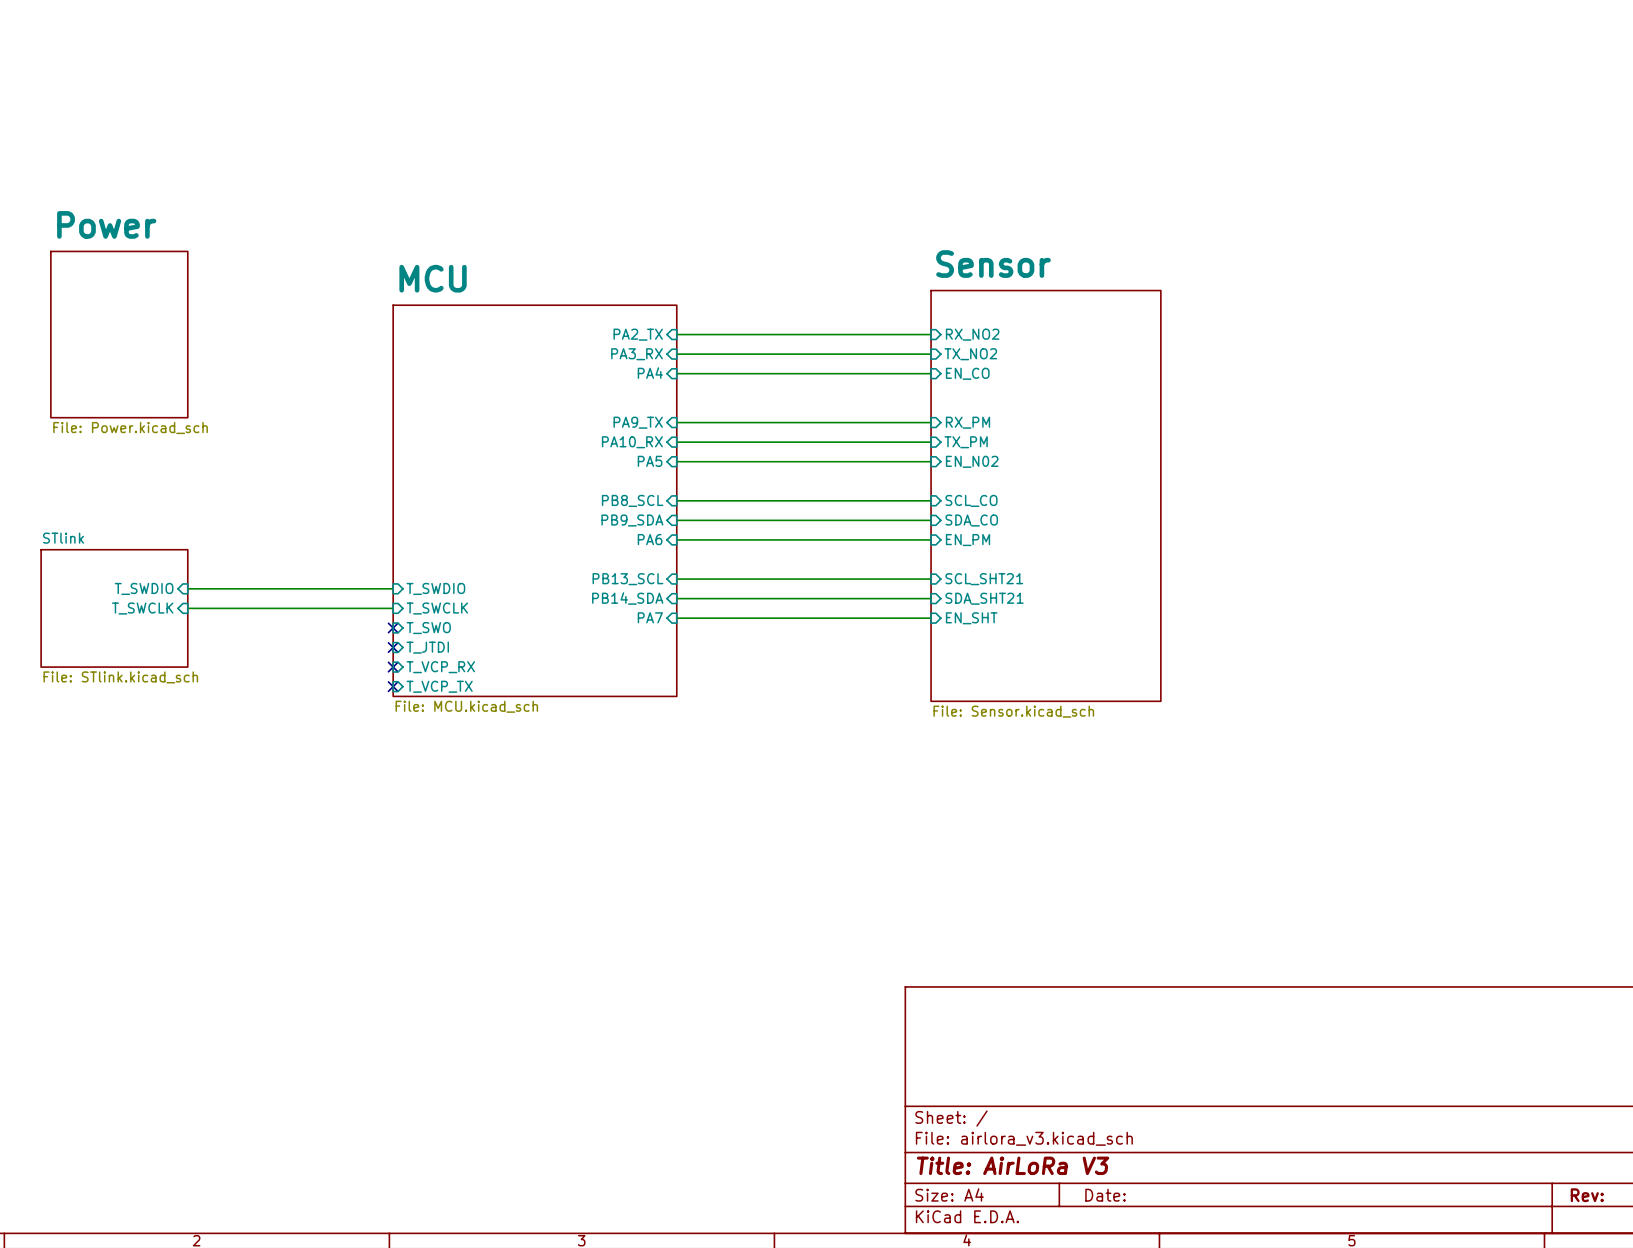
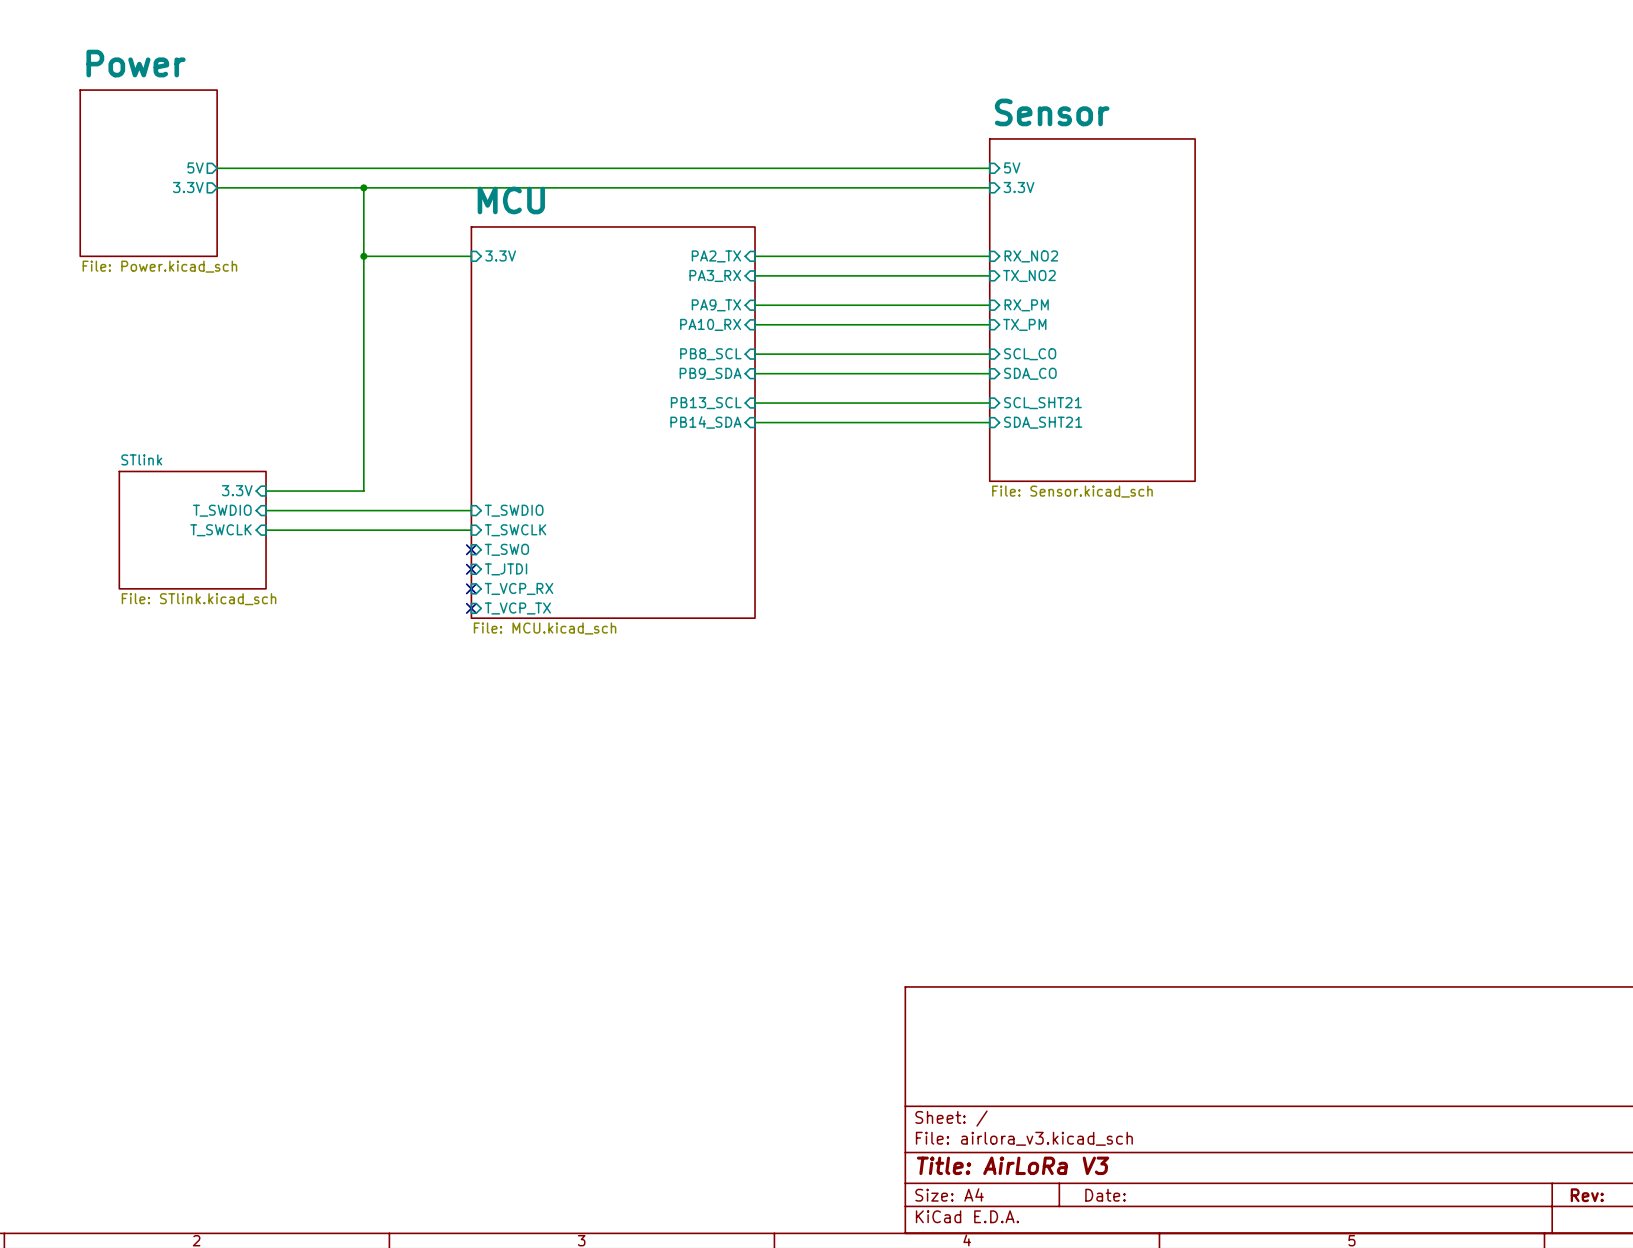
sheet pin: none -> 5V (195, 167)
sheet pin: none -> 5V (1012, 167)
wire: none -> (217, 168) (989, 168)
sheet pin: none -> 3.3V (188, 187)
wire: none -> (217, 187) (989, 187)
wire: none -> (363, 187) (363, 491) (266, 491)
junction: none -> (363, 187)
sheet pin: none -> 3.3V (1018, 187)
sheet pin: none -> 3.3V (500, 255)
wire: none -> (363, 256) (471, 256)
junction: none -> (363, 256)
wire: none -> (755, 256) (989, 256)
wire: none -> (755, 275) (989, 275)
wire: none -> (755, 305) (989, 305)
sheet Sensor: none -> File: Sensor.kicad_sch (1092, 310)
wire: none -> (755, 324) (989, 324)
sheet Power position: (119, 334) -> (148, 173)
sheet pin position: PA2_TX (638, 334) -> PA2_TX (716, 256)
wire: (676, 334) (931, 334) -> none
sheet pin position: RX_NO2 (972, 334) -> RX_NO2 (1031, 256)
sheet pin position: PA3_RX (637, 354) -> PA3_RX (715, 275)
wire: (676, 354) (755, 354) -> none
wire: none -> (931, 354) (989, 354)
sheet pin position: TX_NO2 (970, 354) -> TX_NO2 (1029, 275)
sheet pin: PA4 (650, 373) -> none
wire: (676, 373) (755, 373) -> none
wire: none -> (931, 373) (989, 373)
sheet pin: EN_CO (967, 373) -> none
sheet pin: none -> PB13_SCL (706, 403)
wire: none -> (755, 403) (989, 403)
sheet pin position: PA9_TX (638, 422) -> PA9_TX (716, 305)
wire: (676, 422) (755, 422) -> none
sheet pin: none -> PB14_SDA (705, 422)
wire: none -> (931, 422) (989, 422)
sheet pin position: RX_PM (967, 422) -> RX_PM (1026, 305)
sheet pin position: PA10_RX (632, 442) -> PA10_RX (710, 324)
wire: (676, 442) (931, 442) -> none
sheet pin position: TX_PM (966, 442) -> TX_PM (1024, 324)
sheet pin: PA5 (650, 461) -> none
wire: (676, 461) (931, 461) -> none
sheet pin: EN_N02 (972, 461) -> none
sheet pin: none -> 3.3V (237, 490)
sheet Sensor: File: Sensor.kicad_sch (1045, 495) -> none
sheet MCU position: (534, 500) -> (613, 422)
sheet pin position: PB8_SCL (632, 500) -> PB8_SCL (710, 354)
wire: (676, 500) (931, 500) -> none
sheet pin position: SCL_CO (971, 500) -> SCL_CO (1030, 354)
sheet pin: none -> T_SWDIO (222, 510)
sheet pin: none -> T_SWDIO (514, 510)
sheet pin position: PB9_SDA (632, 520) -> PB9_SDA (710, 373)
wire: (676, 520) (931, 520) -> none
sheet pin position: SDA_CO (971, 520) -> SDA_CO (1030, 373)
sheet pin: none -> T_SWCLK (220, 530)
sheet pin: none -> T_SWCLK (515, 530)
sheet pin: PA6 (650, 539) -> none
wire: (676, 539) (931, 539) -> none
sheet pin: EN_PM (967, 540) -> none
no-connect mark: none -> (471, 549)
no-connect mark: none -> (471, 569)
sheet pin: PB13_SCL (627, 579) -> none
wire: (676, 579) (931, 579) -> none
sheet pin position: SCL_SHT21 (984, 579) -> SCL_SHT21 (1042, 403)
sheet pin: T_SWDIO (144, 588) -> none
wire: (187, 588) (393, 588) -> (266, 510) (471, 510)
sheet pin: T_SWDIO (435, 588) -> none
no-connect mark: none -> (471, 588)
sheet pin: PB14_SDA (627, 598) -> none
wire: (676, 598) (931, 598) -> none
sheet pin position: SDA_SHT21 (984, 598) -> SDA_SHT21 (1043, 422)
sheet STlink position: (114, 608) -> (192, 530)
sheet pin: T_SWCLK (142, 608) -> none
wire: (187, 608) (393, 608) -> (266, 530) (471, 530)
sheet pin: T_SWCLK (437, 608) -> none
no-connect mark: none -> (471, 608)
sheet pin: PA7 (650, 617) -> none
wire: (676, 618) (931, 618) -> none
sheet pin: EN_SHT (971, 618) -> none
no-connect mark: (393, 627) -> none
sheet pin position: T_SWO (428, 628) -> T_SWO (506, 549)
no-connect mark: (393, 647) -> none
sheet pin position: T_JTDI (427, 647) -> T_JTDI (506, 569)
no-connect mark: (393, 667) -> none
sheet pin position: T_VCP_RX (440, 667) -> T_VCP_RX (519, 588)
no-connect mark: (393, 686) -> none
sheet pin position: T_VCP_TX (439, 686) -> T_VCP_TX (517, 608)

